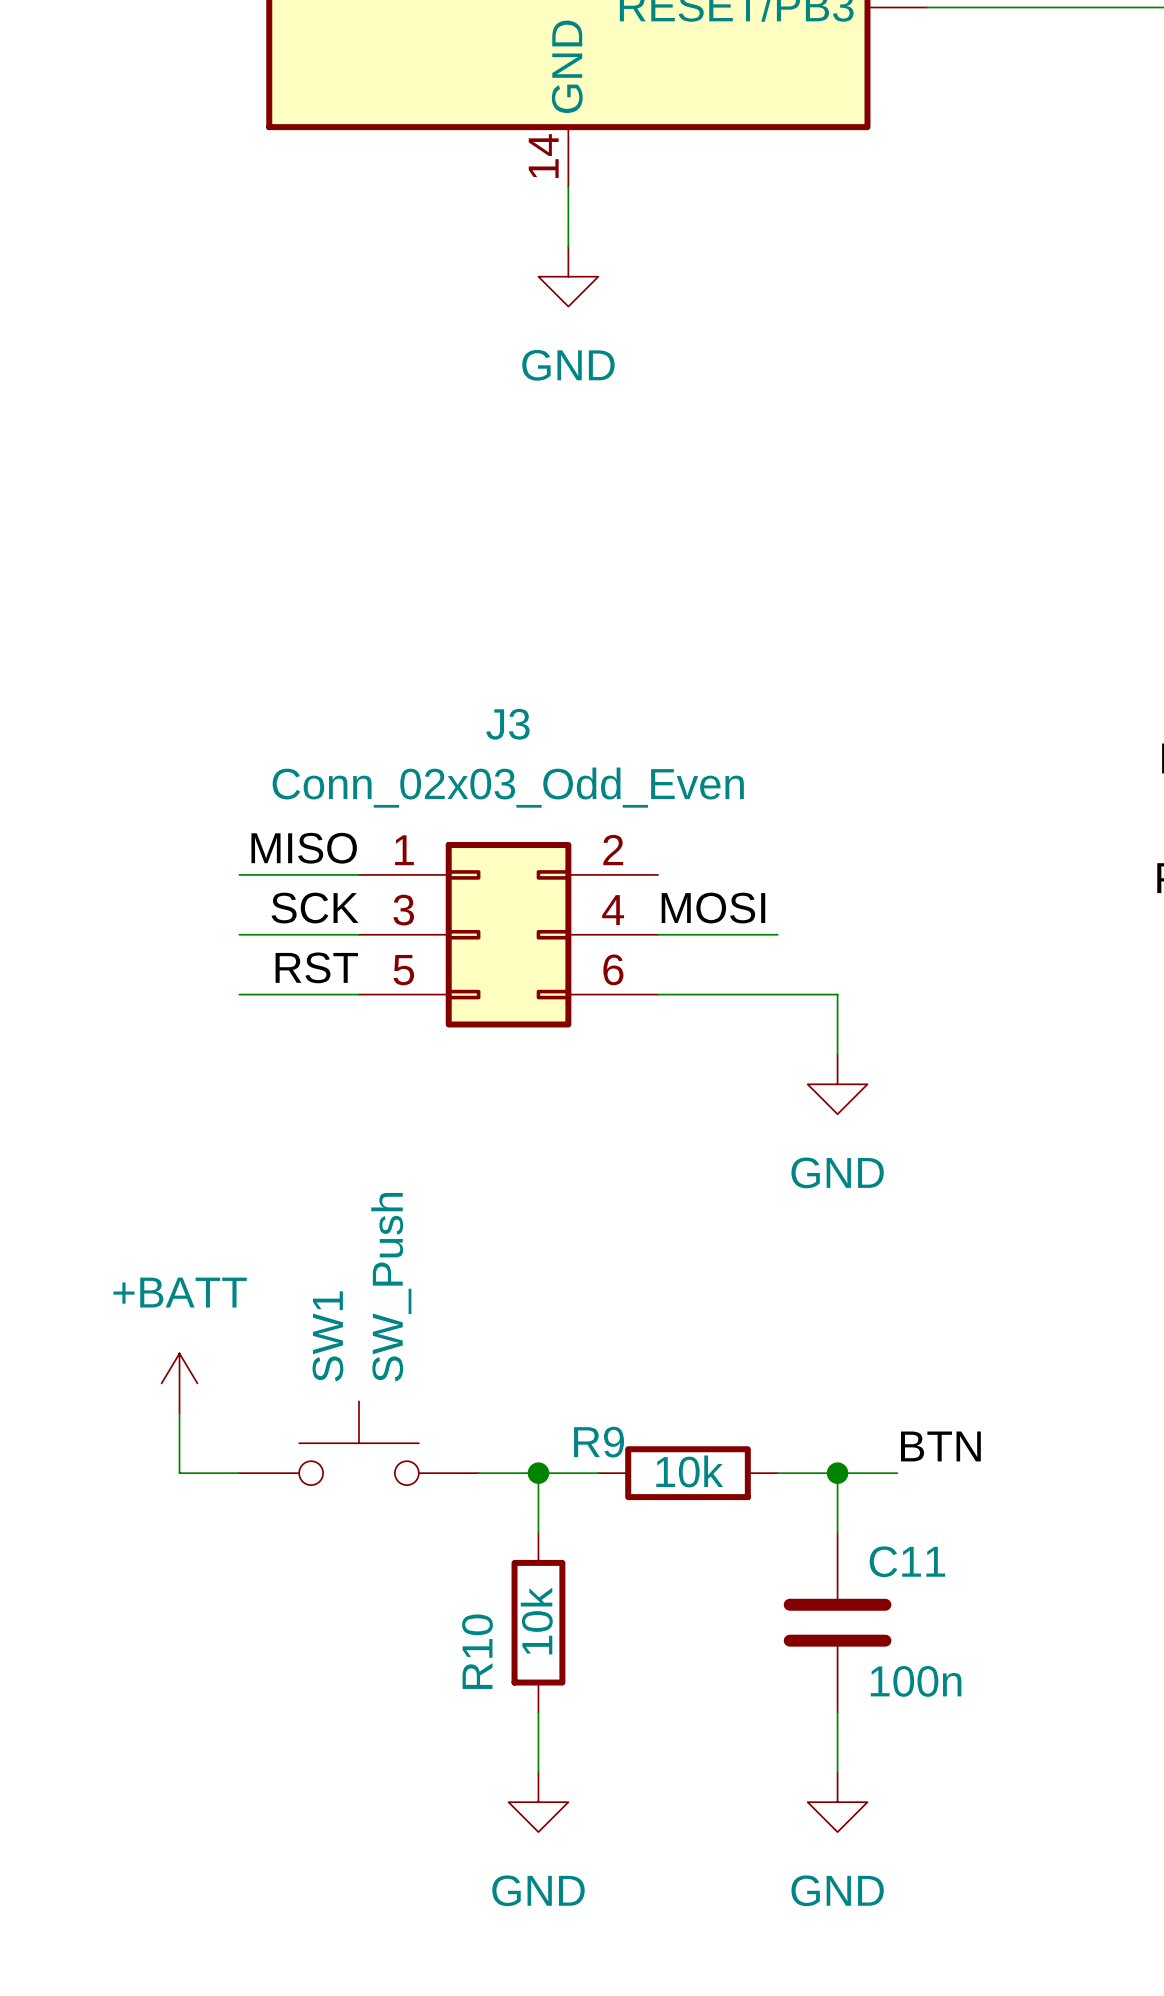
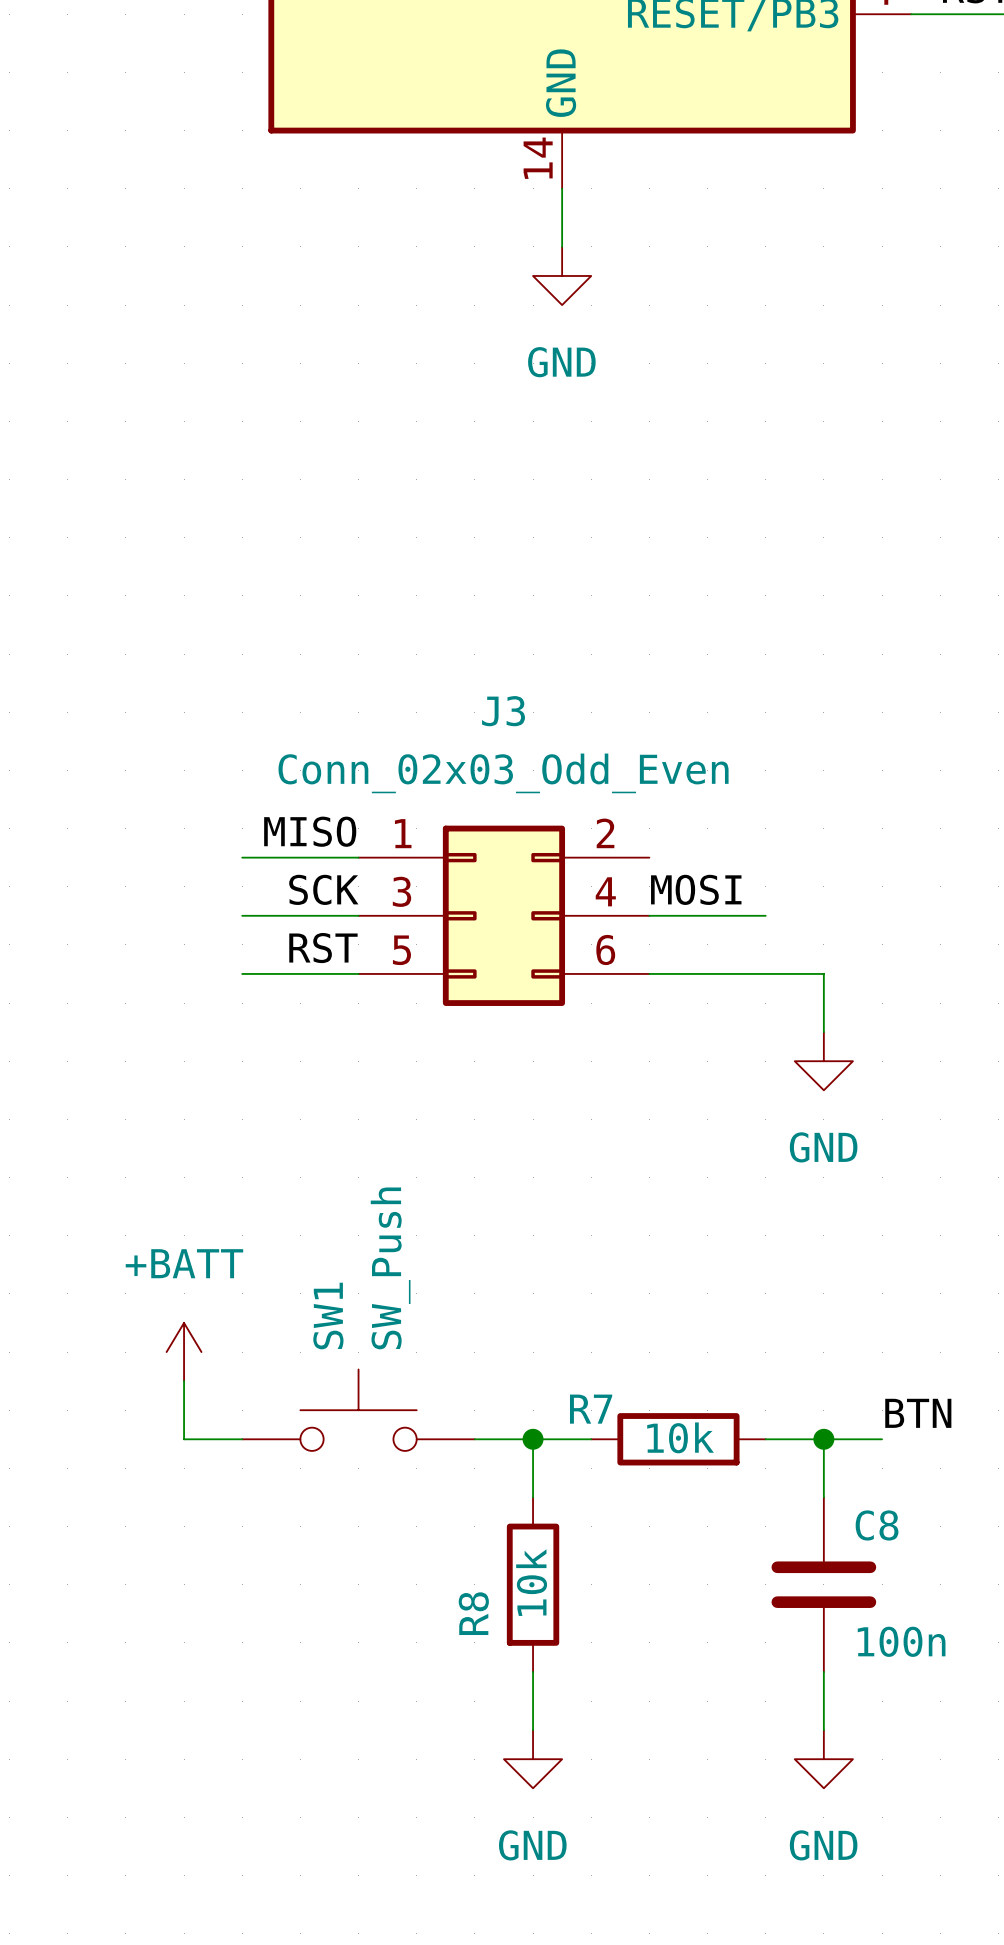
R9 name: R9 (599, 1442) -> R7 (591, 1409)
C11 name: C11 (907, 1561) -> C8 (877, 1525)
R10 name: R10 (477, 1651) -> R8 (473, 1613)

